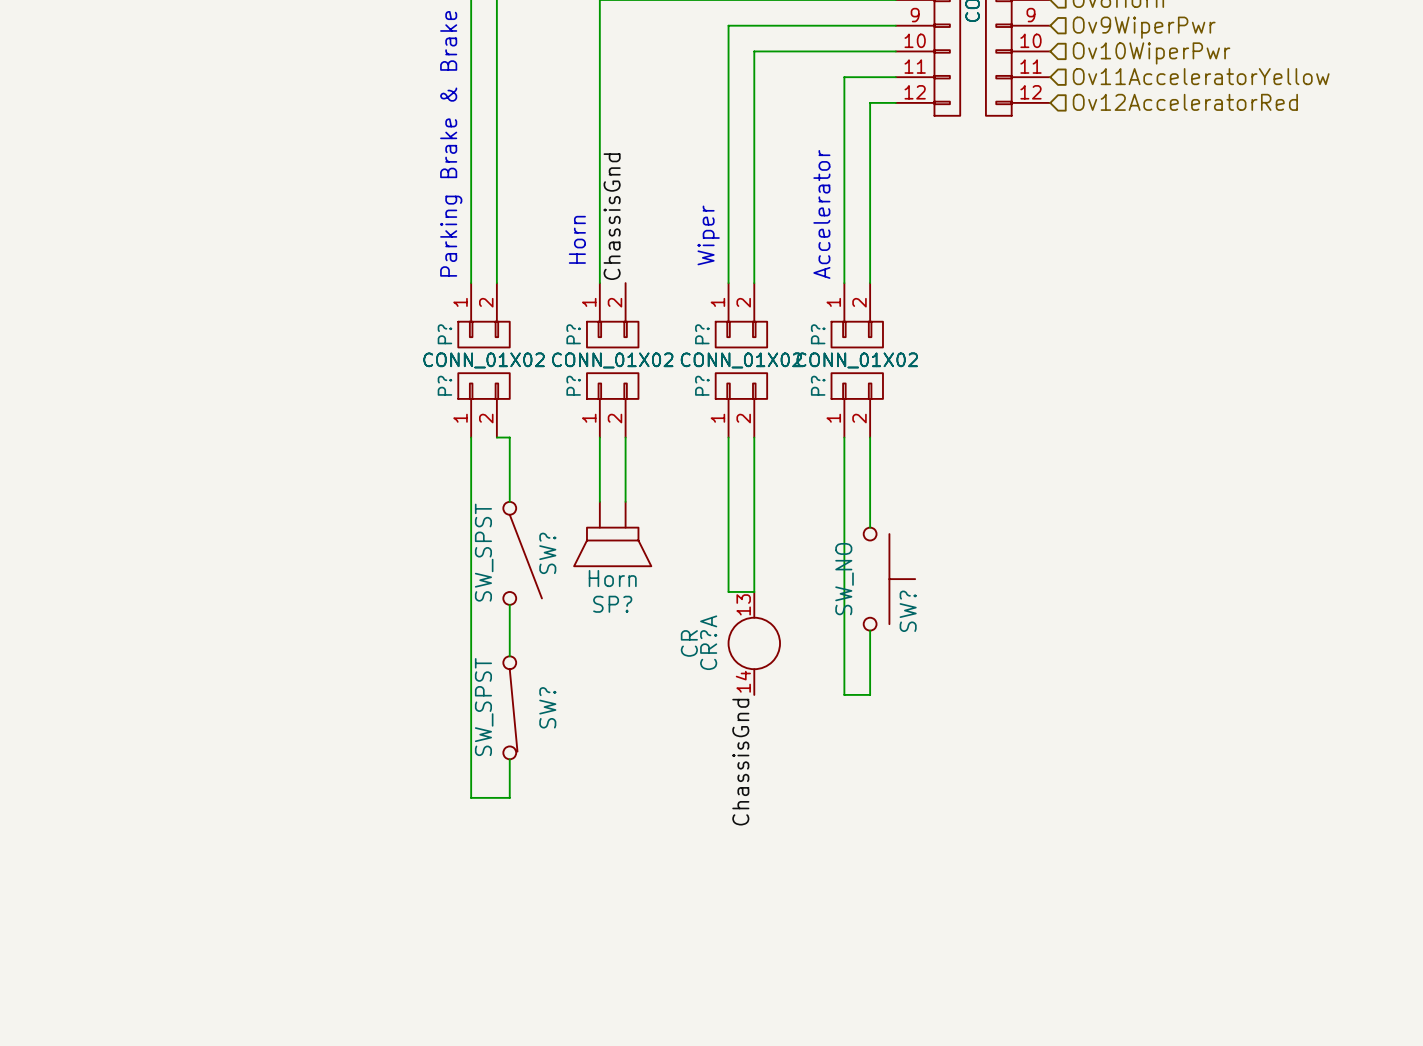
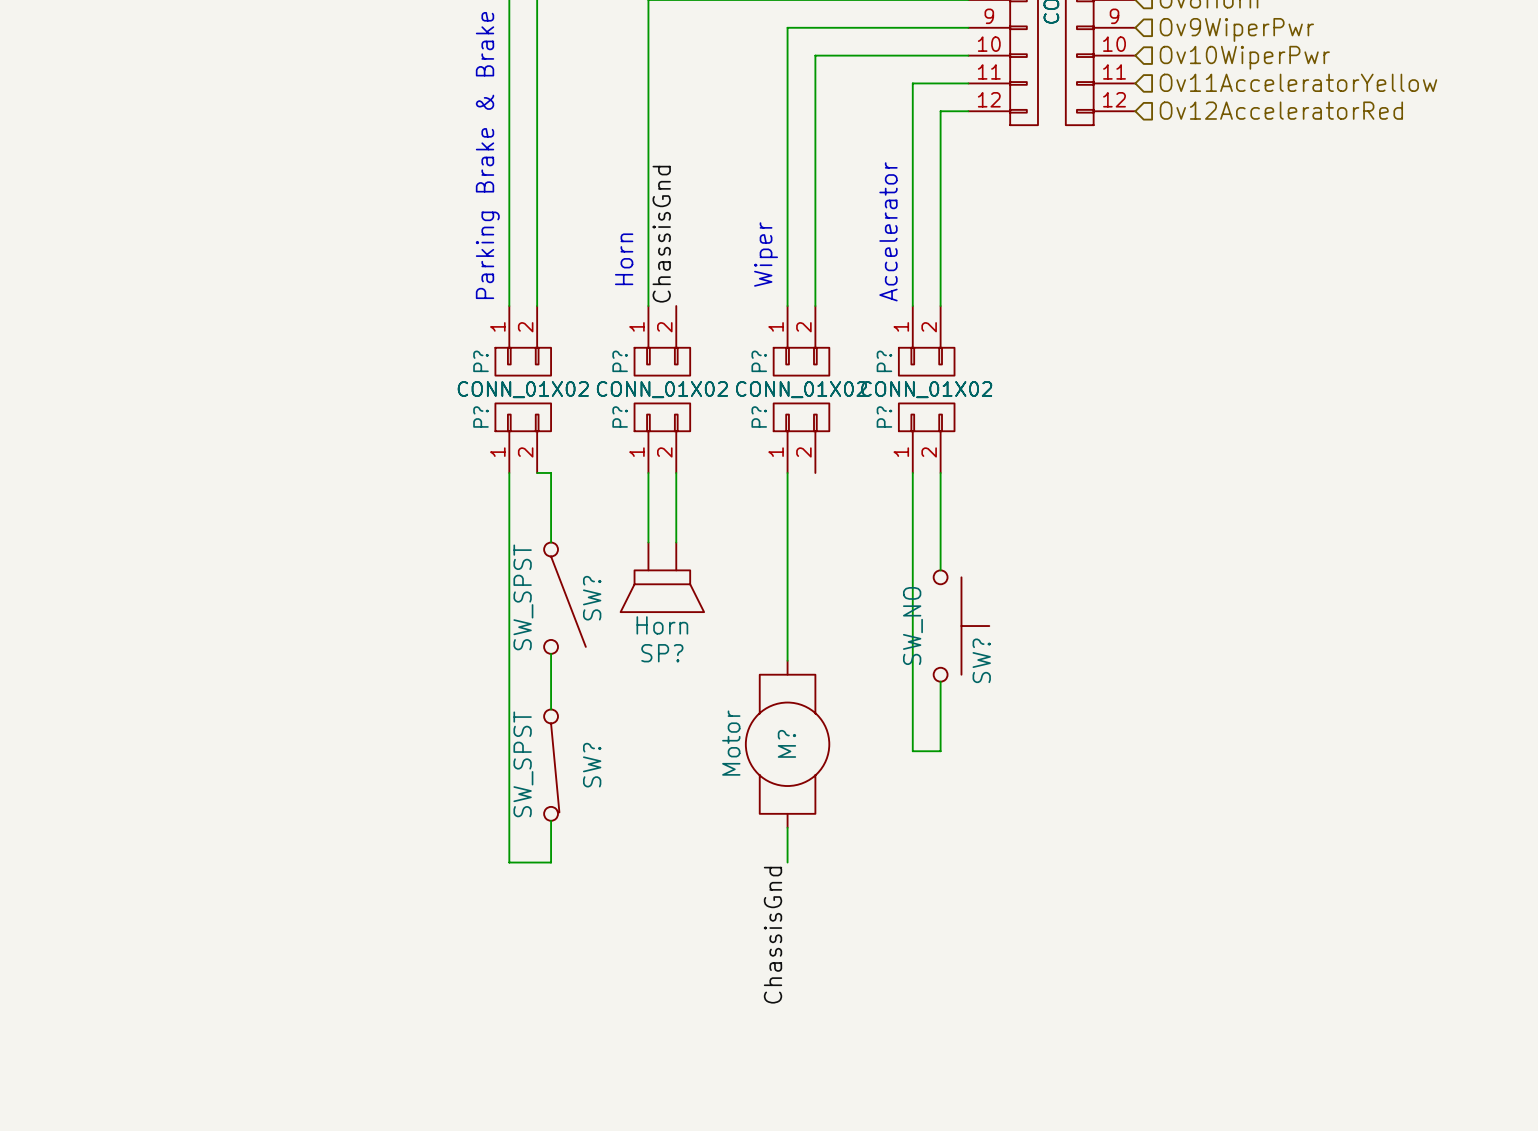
wire: (754, 437) (754, 591) (728, 591) -> (787, 660) (787, 639)
CR?A: CR (754, 643) -> none
M?: none -> Motor (787, 744)
label position: ChassisGnd (740, 762) -> ChassisGnd (773, 935)
wire: none -> (787, 827) (787, 862)

